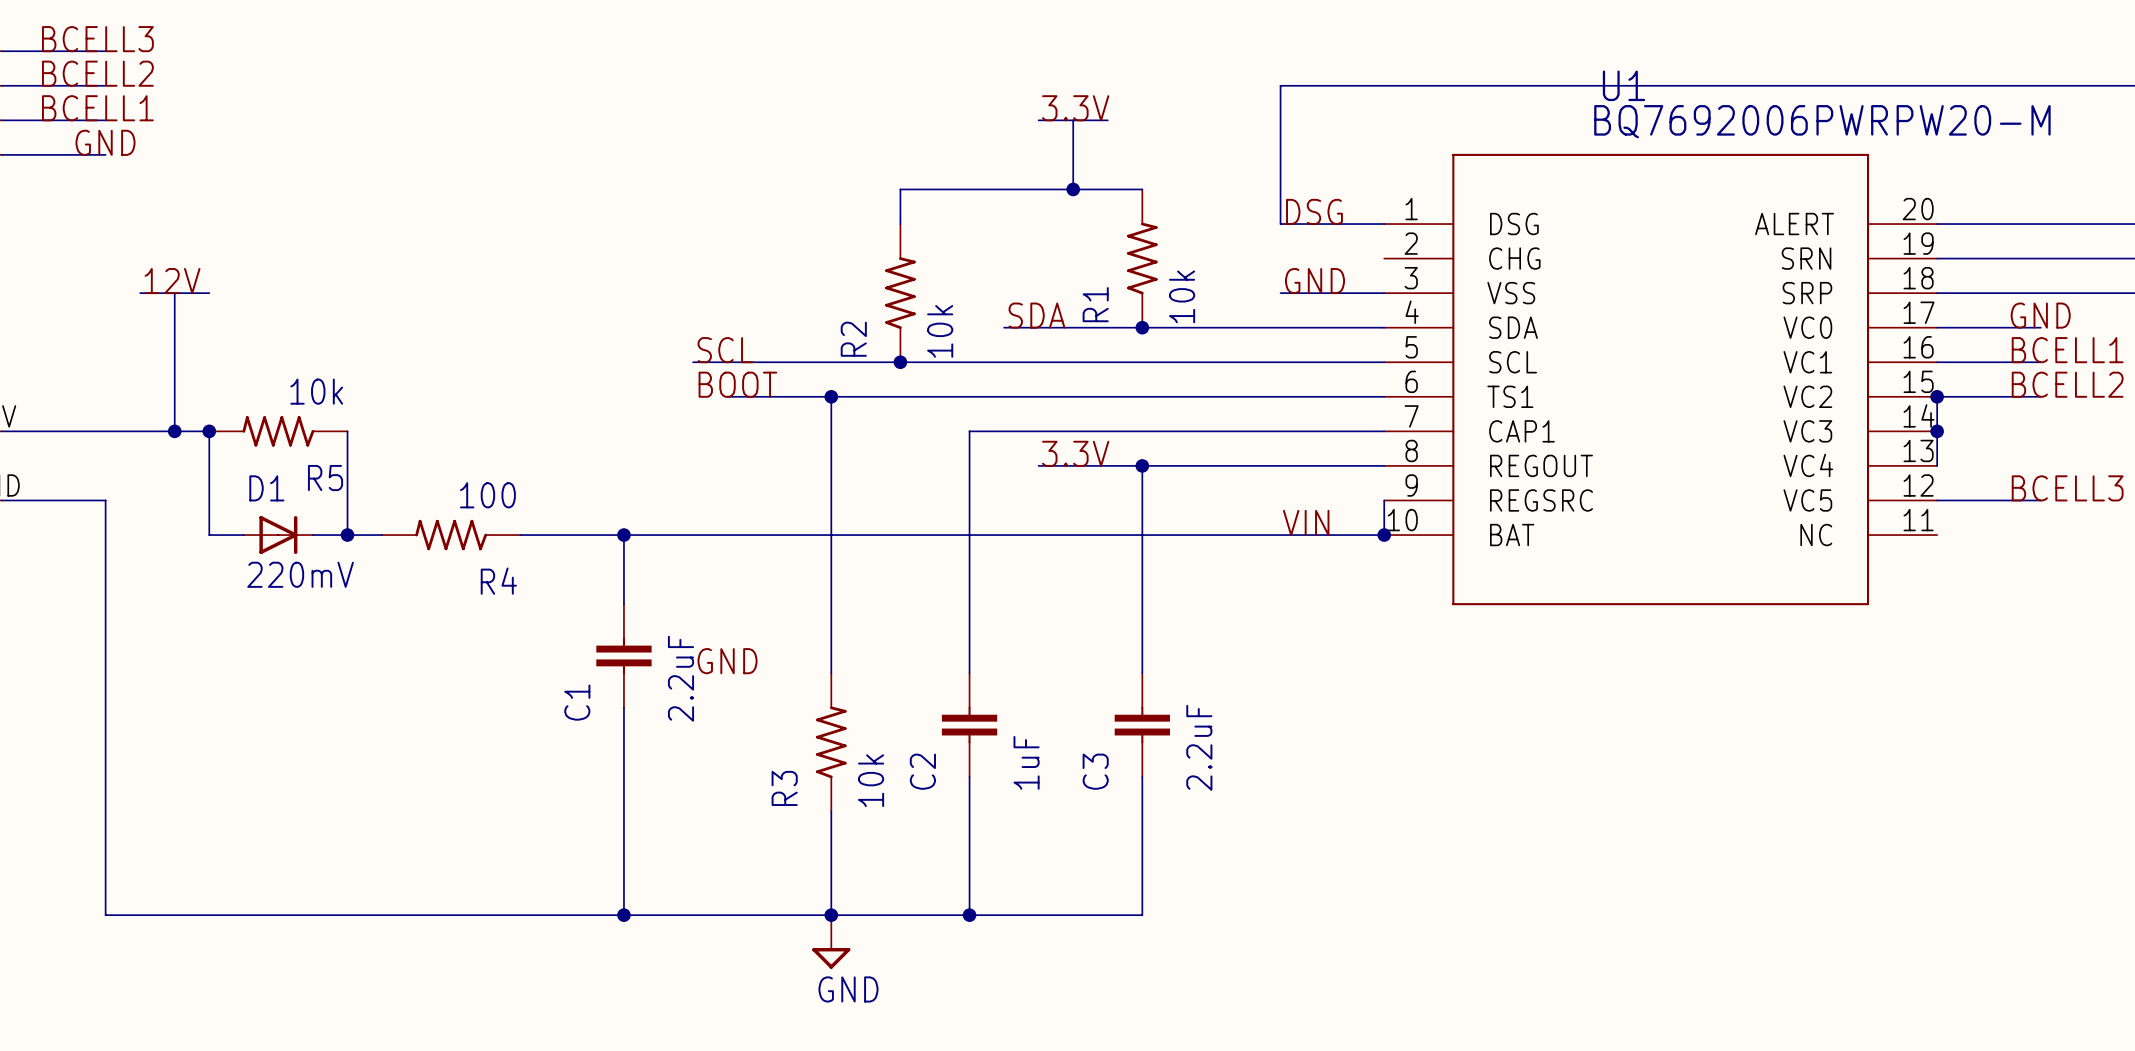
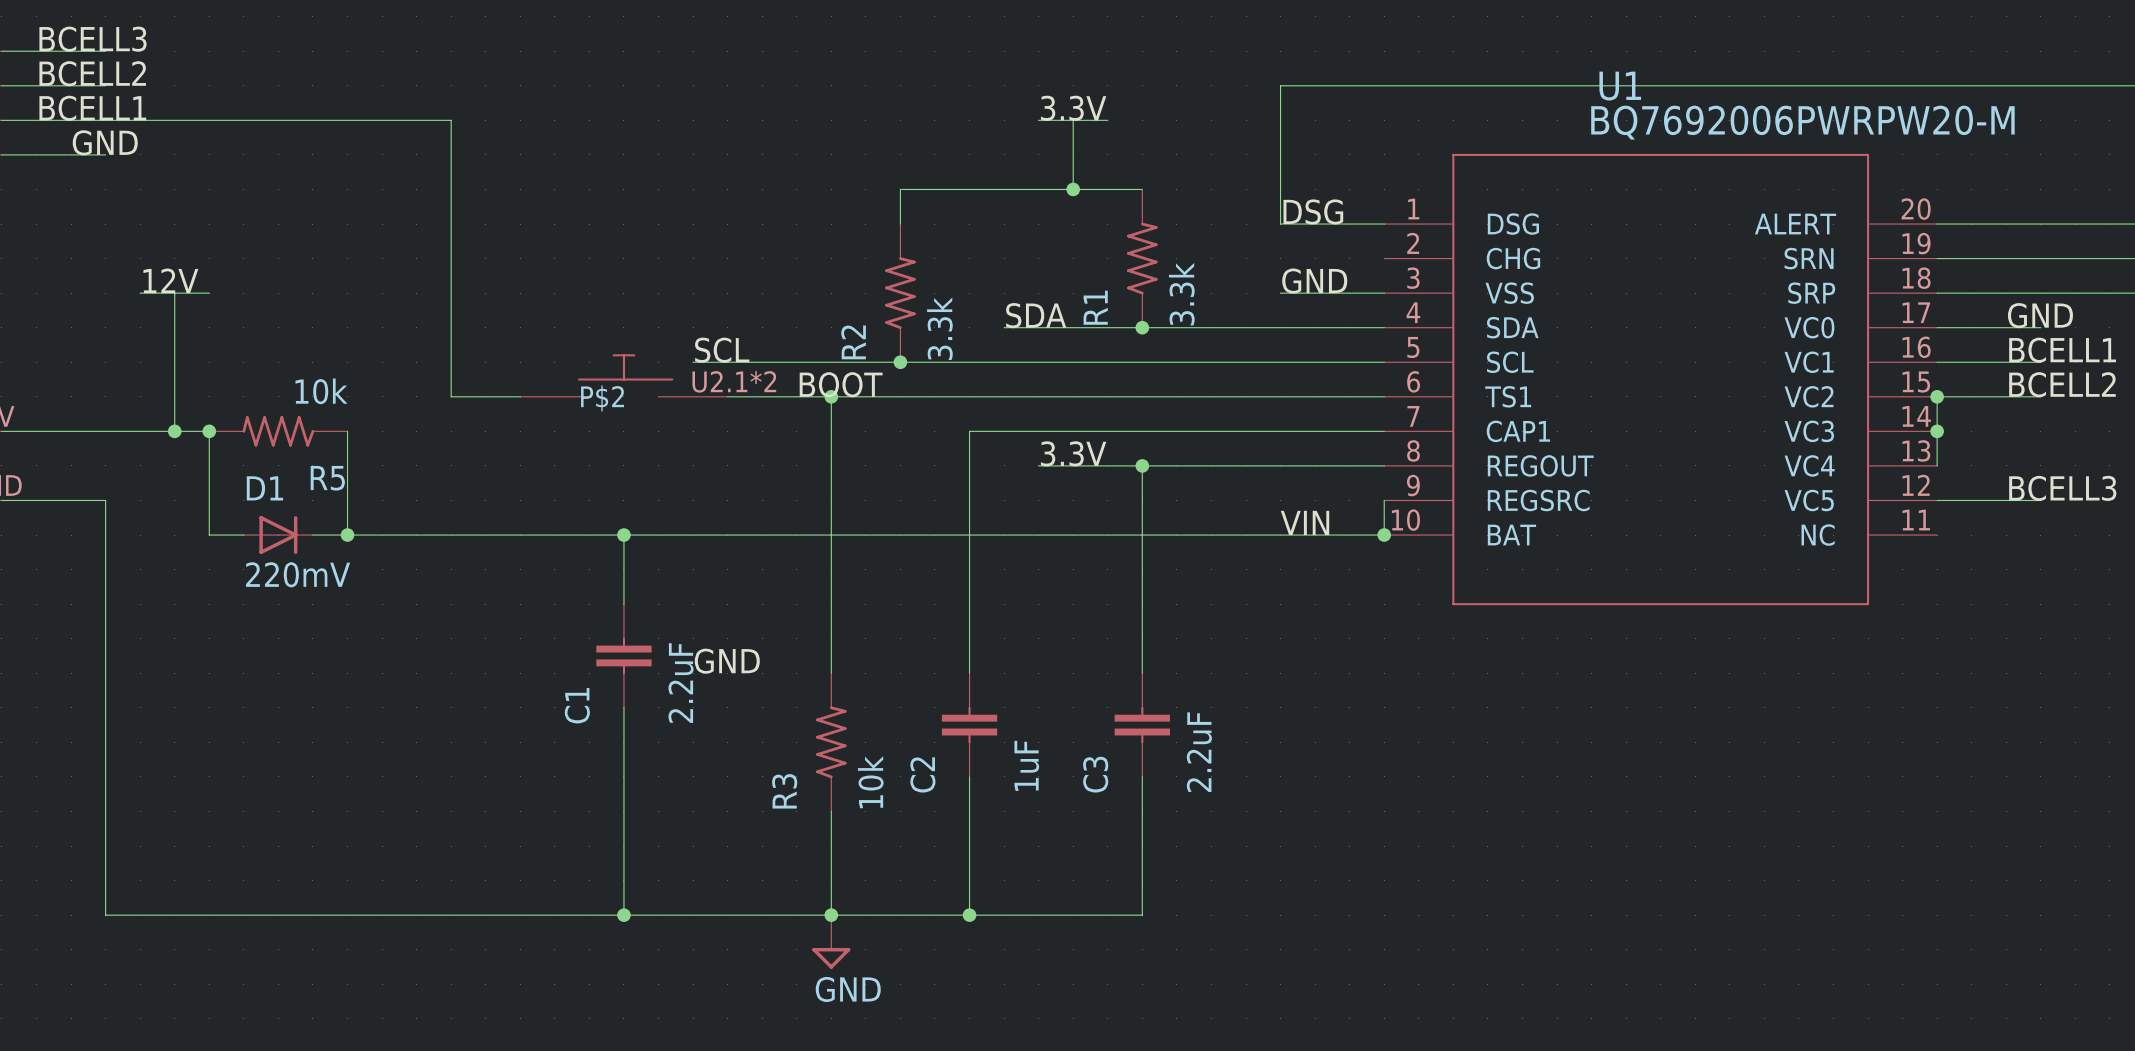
wire: none -> (105, 120) (451, 120) (451, 396) (520, 396)
R1 value: 10k (1182, 296) -> 3.3k (1181, 294)
R2 value: 10k (940, 331) -> 3.3k (939, 328)
part: none -> (623, 375)
label position: BOOT (737, 384) -> BOOT (841, 384)
R4: 100 (451, 535) -> none

